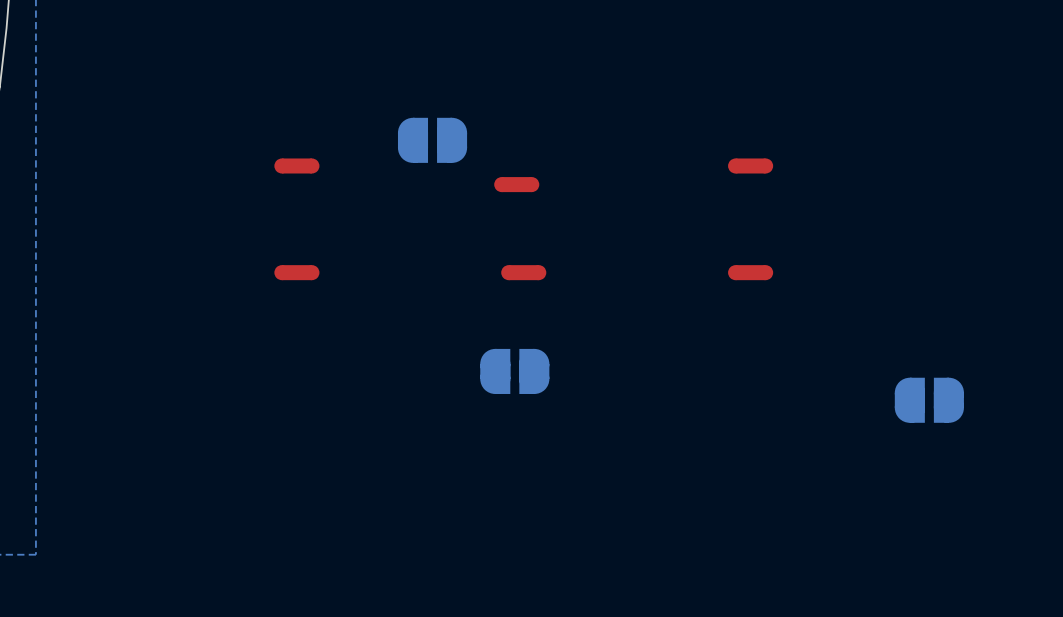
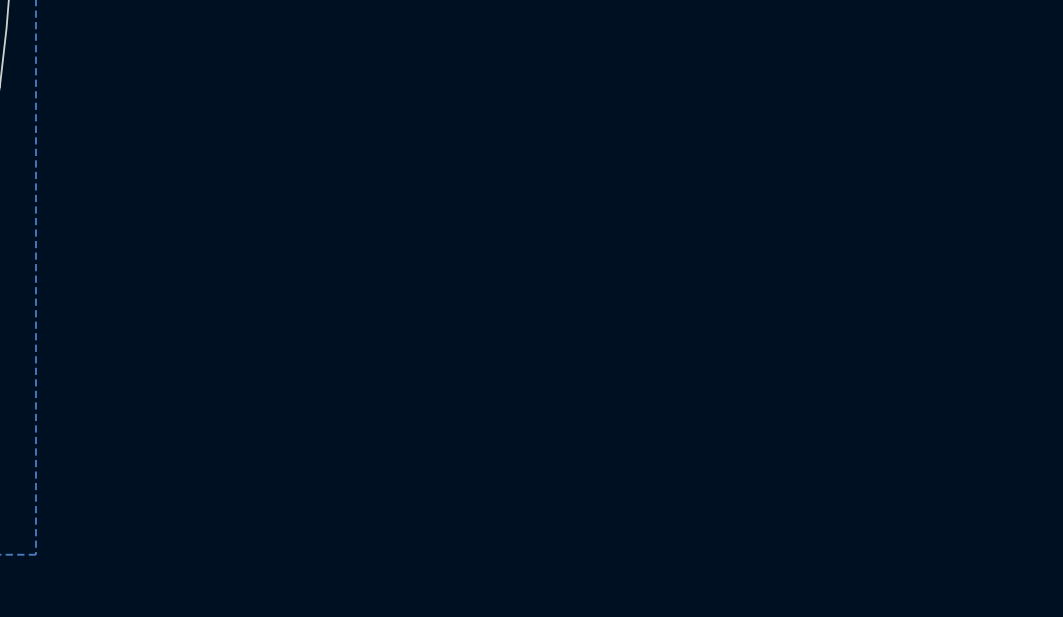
part: (432, 140) -> none
part: (296, 165) -> none
part: (750, 165) -> none
part: (516, 184) -> none
part: (296, 272) -> none
part: (523, 272) -> none
part: (750, 272) -> none
part: (514, 371) -> none
part: (929, 400) -> none

